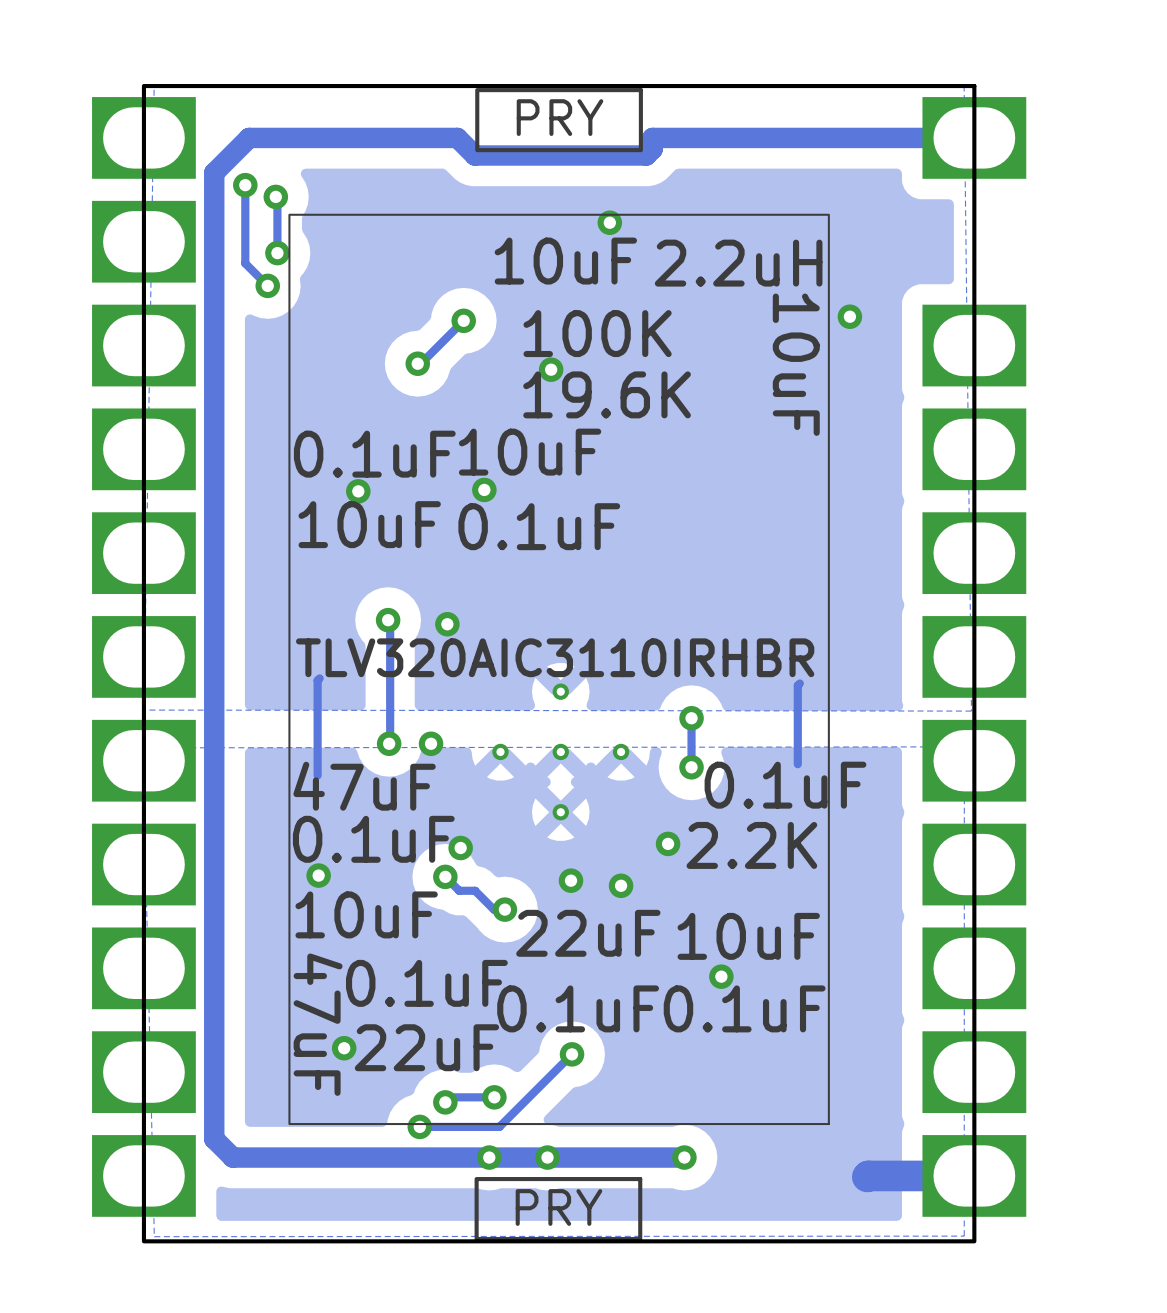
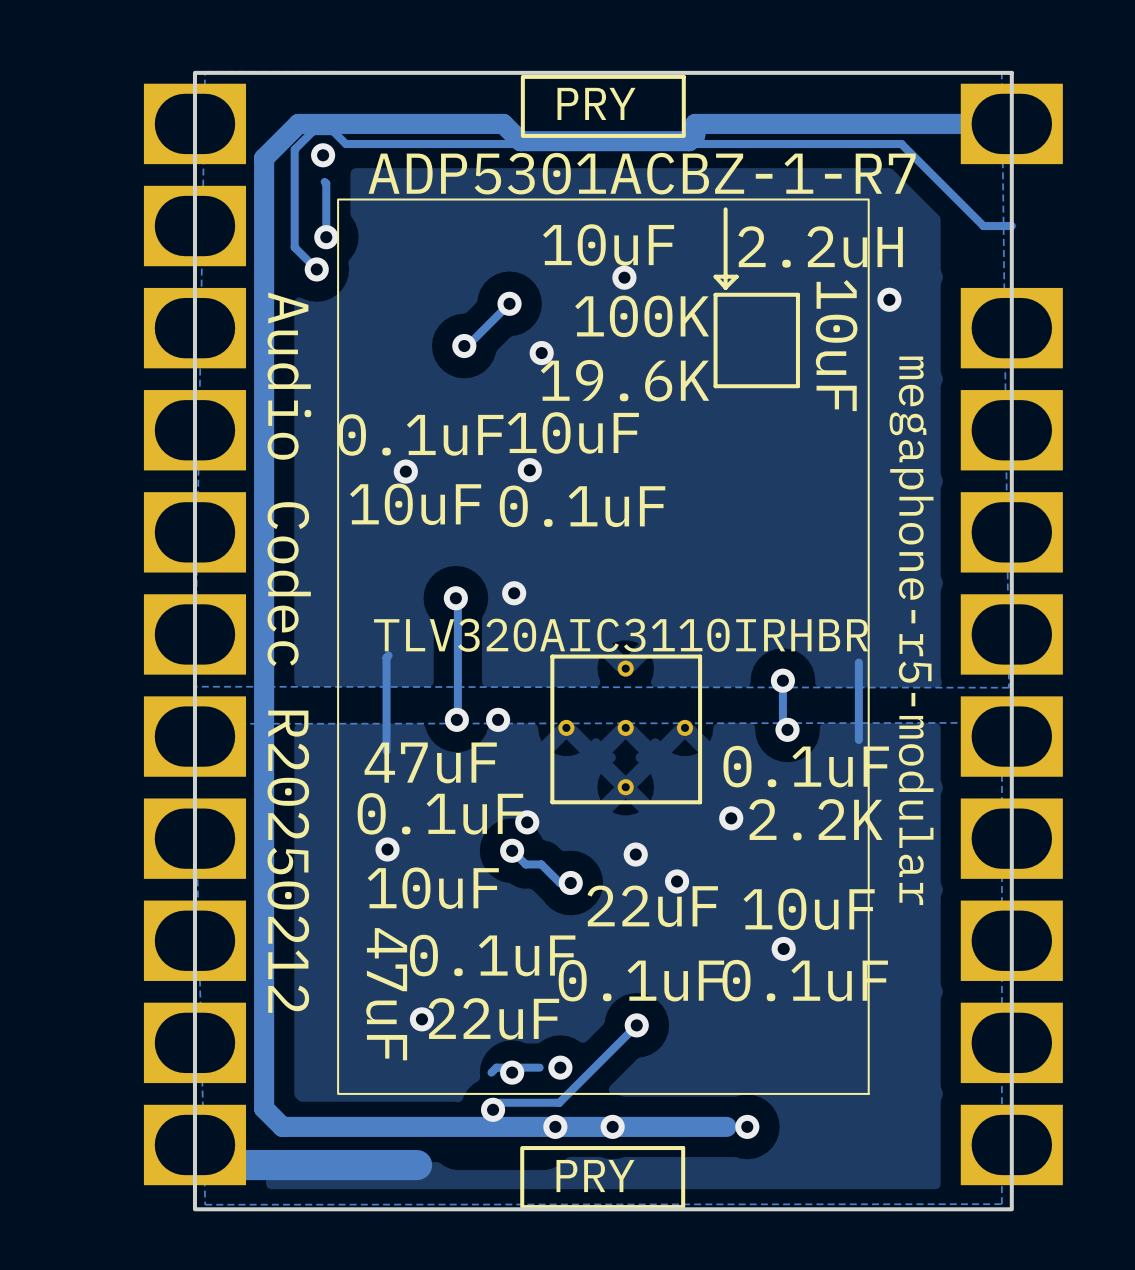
via: none -> (323, 155)
track: none -> (294, 170) (294, 149) (313, 131) (333, 131) (345, 144) (901, 144) (983, 226) (1011, 226)
via: (245, 185) -> none
part: none -> ADP5301ACBZ-1-R7 (642, 173)
via: (275, 196) -> none
via: (609, 222) -> none
line: none -> (725, 209) (725, 287)
part position: (738, 263) -> (820, 247)
via: none -> (624, 277)
line: none -> (725, 287) (715, 276) (736, 276) (725, 287)
line: none -> (797, 294) (715, 294) (715, 386) (797, 386) (797, 294)
via: (551, 369) -> none
via: none -> (541, 353)
part position: (607, 394) -> (624, 380)
track: (388, 620) (390, 622) (389, 743) -> (455, 598) (457, 600) (456, 719)
via position: (388, 620) -> (455, 598)
via position: (447, 624) -> (514, 593)
track: (319, 678) (317, 680) (317, 775) -> (388, 655) (386, 657) (386, 751)
line: none -> (700, 656) (552, 656) (552, 802) (700, 802) (700, 656)
text: none -> megaphone-r5-modular (911, 630)
track: (799, 683) (797, 685) (797, 764) -> none
track: none -> (858, 662) (858, 739)
text: none -> Audio Codec R20250212 (289, 652)
track: none -> (782, 680) (782, 725) (787, 729)
via: none -> (782, 680)
track: (691, 718) (691, 767) -> none
via: (691, 718) -> none
via: (389, 743) -> none
via: none -> (456, 719)
via: (431, 743) -> none
via: none -> (498, 719)
part position: (560, 751) -> (625, 727)
via: none -> (787, 729)
via: (691, 767) -> none
part position: (785, 785) -> (806, 766)
part position: (364, 786) -> (430, 762)
part position: (373, 839) -> (440, 813)
via position: (668, 843) -> (731, 818)
part position: (751, 845) -> (815, 819)
via position: (460, 847) -> (527, 822)
via position: (318, 875) -> (387, 849)
track: (445, 876) (459, 890) (475, 890) (493, 909) (504, 909) -> (512, 850) (525, 864) (541, 864) (559, 882) (570, 882)
via position: (445, 876) -> (512, 850)
via position: (571, 880) -> (635, 854)
via position: (621, 885) -> (677, 881)
via position: (504, 909) -> (570, 882)
part position: (366, 914) -> (433, 888)
part position: (588, 933) -> (652, 906)
part position: (748, 936) -> (809, 909)
via position: (721, 976) -> (783, 948)
part position: (426, 983) -> (492, 955)
part position: (578, 1008) -> (641, 980)
part position: (744, 1008) -> (805, 980)
part position: (318, 1024) -> (386, 994)
part position: (426, 1047) -> (493, 1018)
via position: (344, 1048) -> (421, 1019)
track: (572, 1054) (499, 1126) (419, 1126) -> none
via position: (572, 1054) -> (636, 1025)
track: none -> (636, 1025) (559, 1102) (500, 1102) (493, 1109)
via position: (494, 1097) -> (560, 1067)
via position: (445, 1102) -> (512, 1072)
via: (419, 1126) -> none
via: none -> (493, 1109)
via position: (489, 1157) -> (555, 1126)
via position: (547, 1157) -> (612, 1126)
via position: (684, 1157) -> (747, 1126)
track: none -> (194, 1144) (215, 1165) (417, 1165)
track: (974, 1175) (867, 1176) -> none

